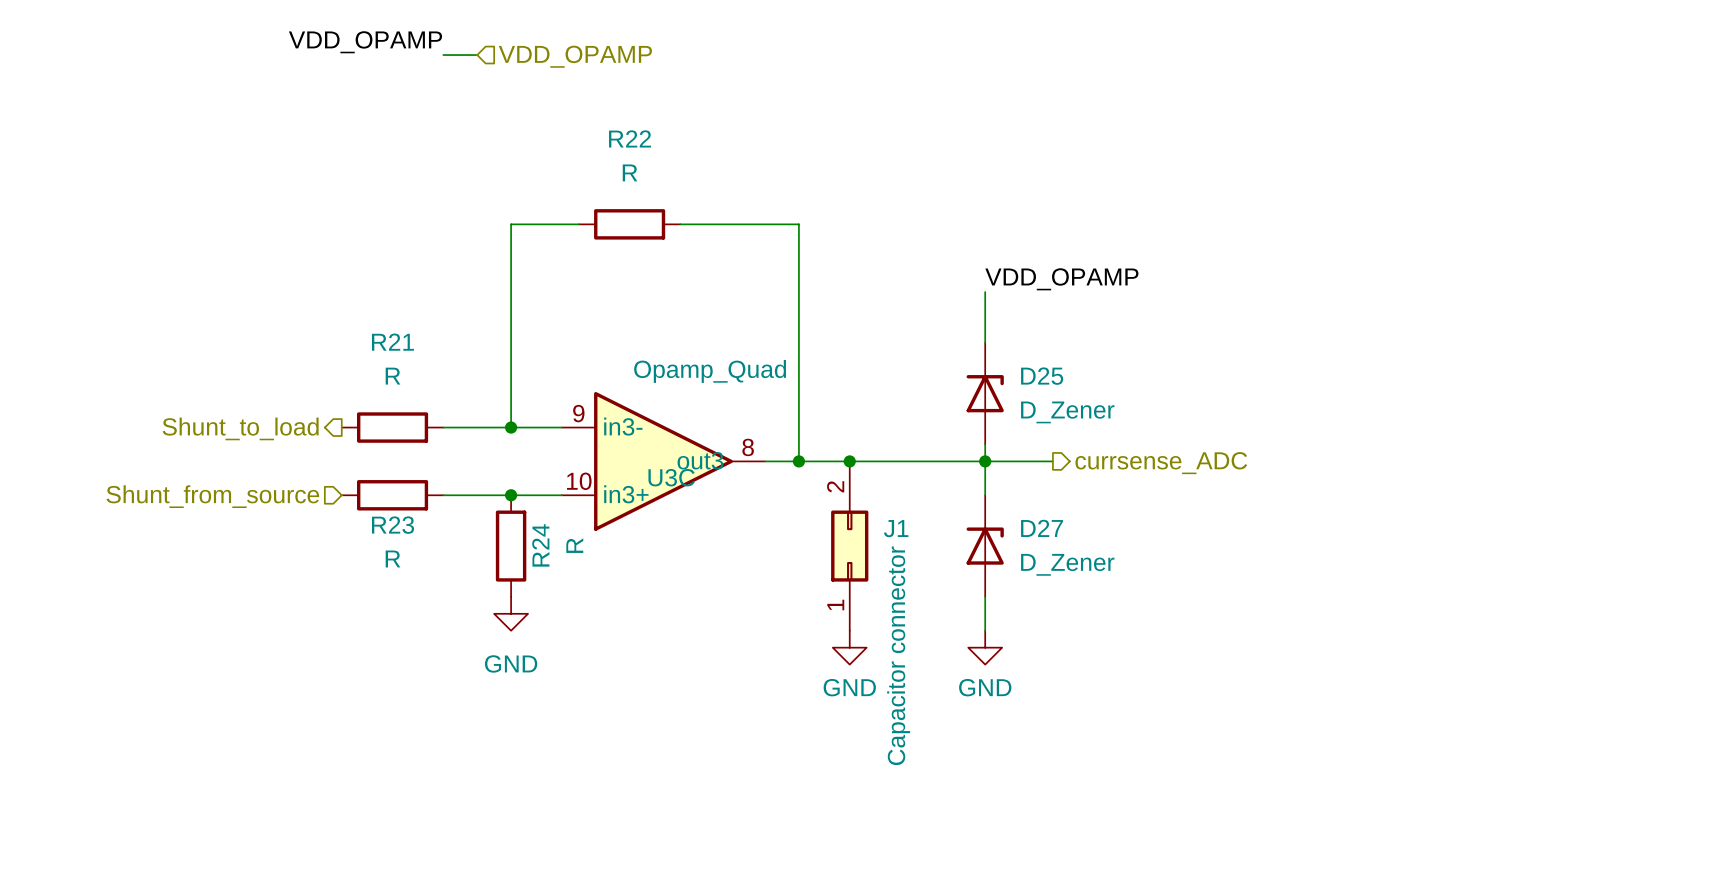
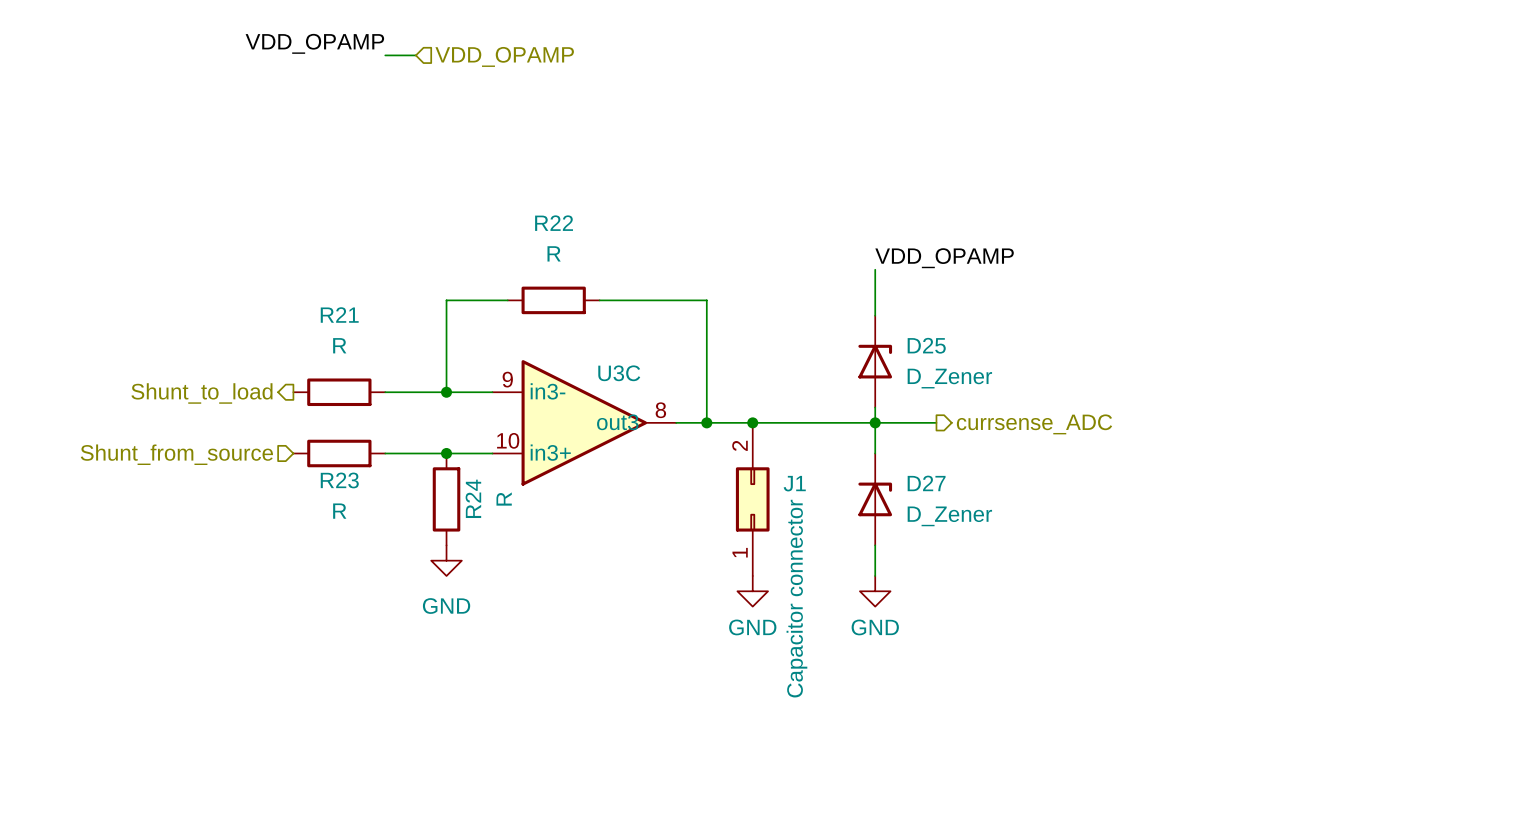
wire: (578, 224) (511, 224) (511, 325) -> (507, 300) (446, 300)
R22 position: (629, 224) -> (553, 300)
wire: (680, 224) (798, 224) (798, 325) -> (599, 300) (706, 300)
U3C value: Opamp_Quad (710, 371) -> none
U3C name position: U3C (671, 477) -> U3C (619, 373)

